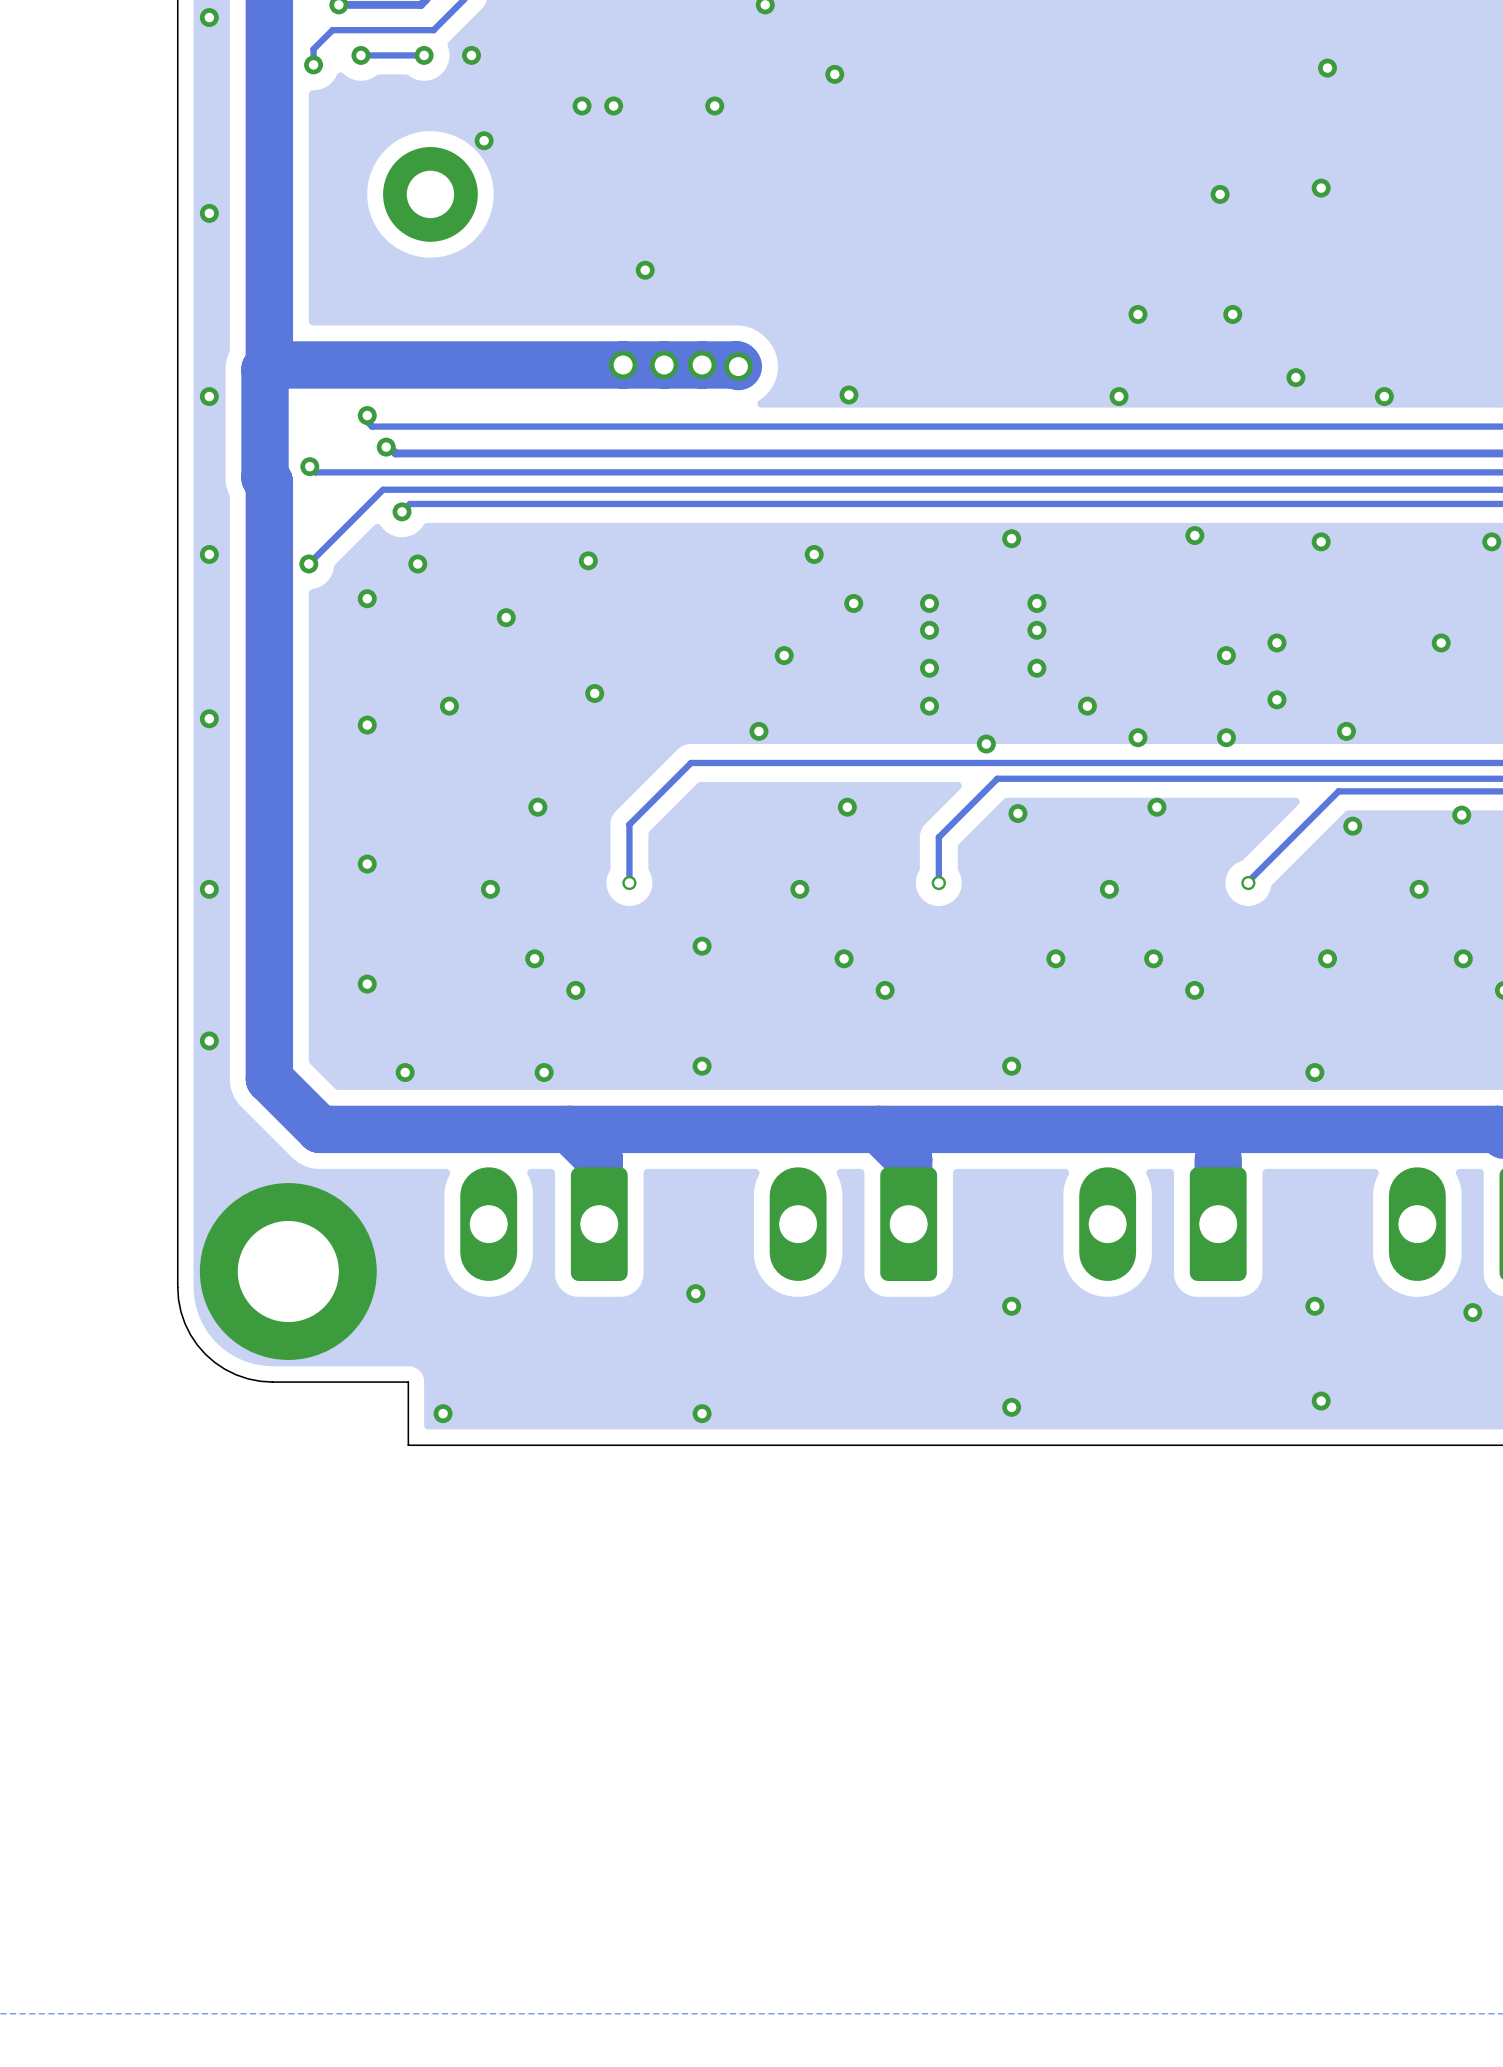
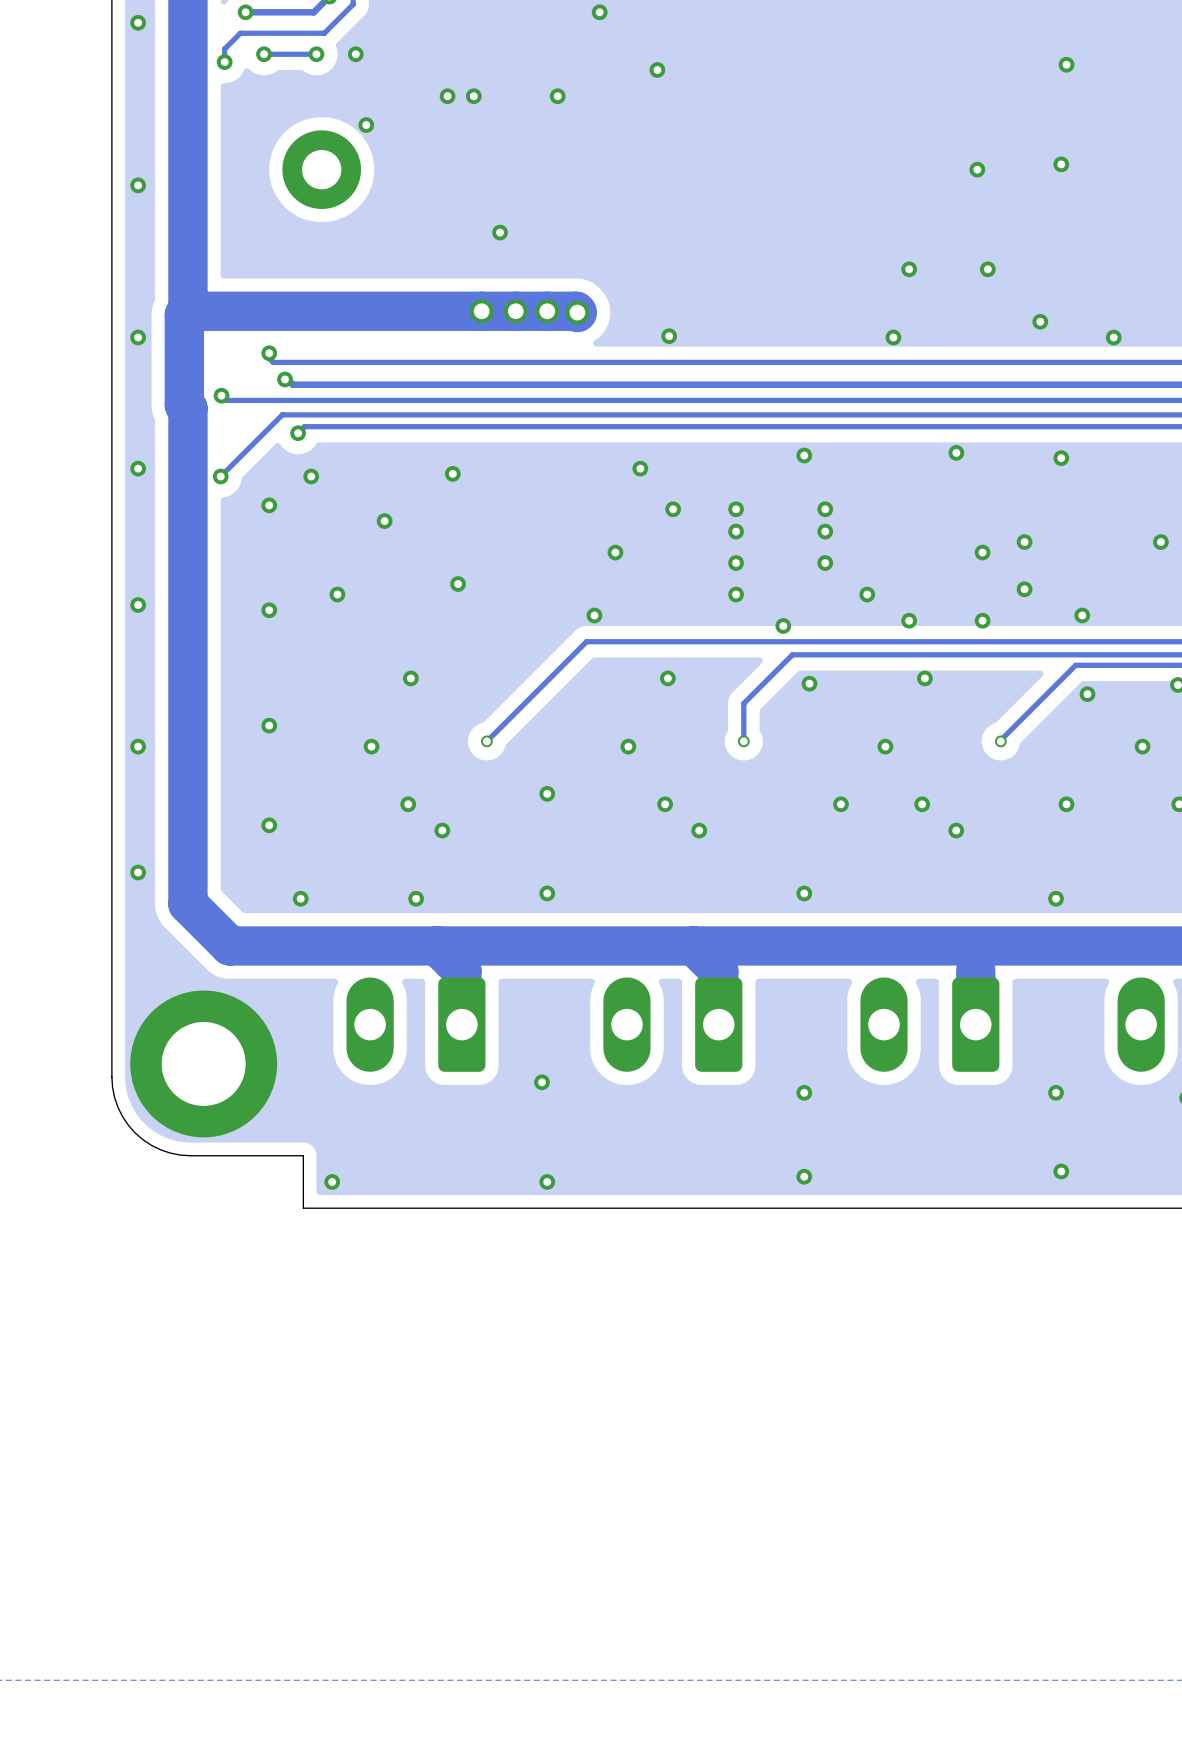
track: (749, 762) (691, 762) (629, 824) (629, 883) -> (586, 641) (486, 741)

